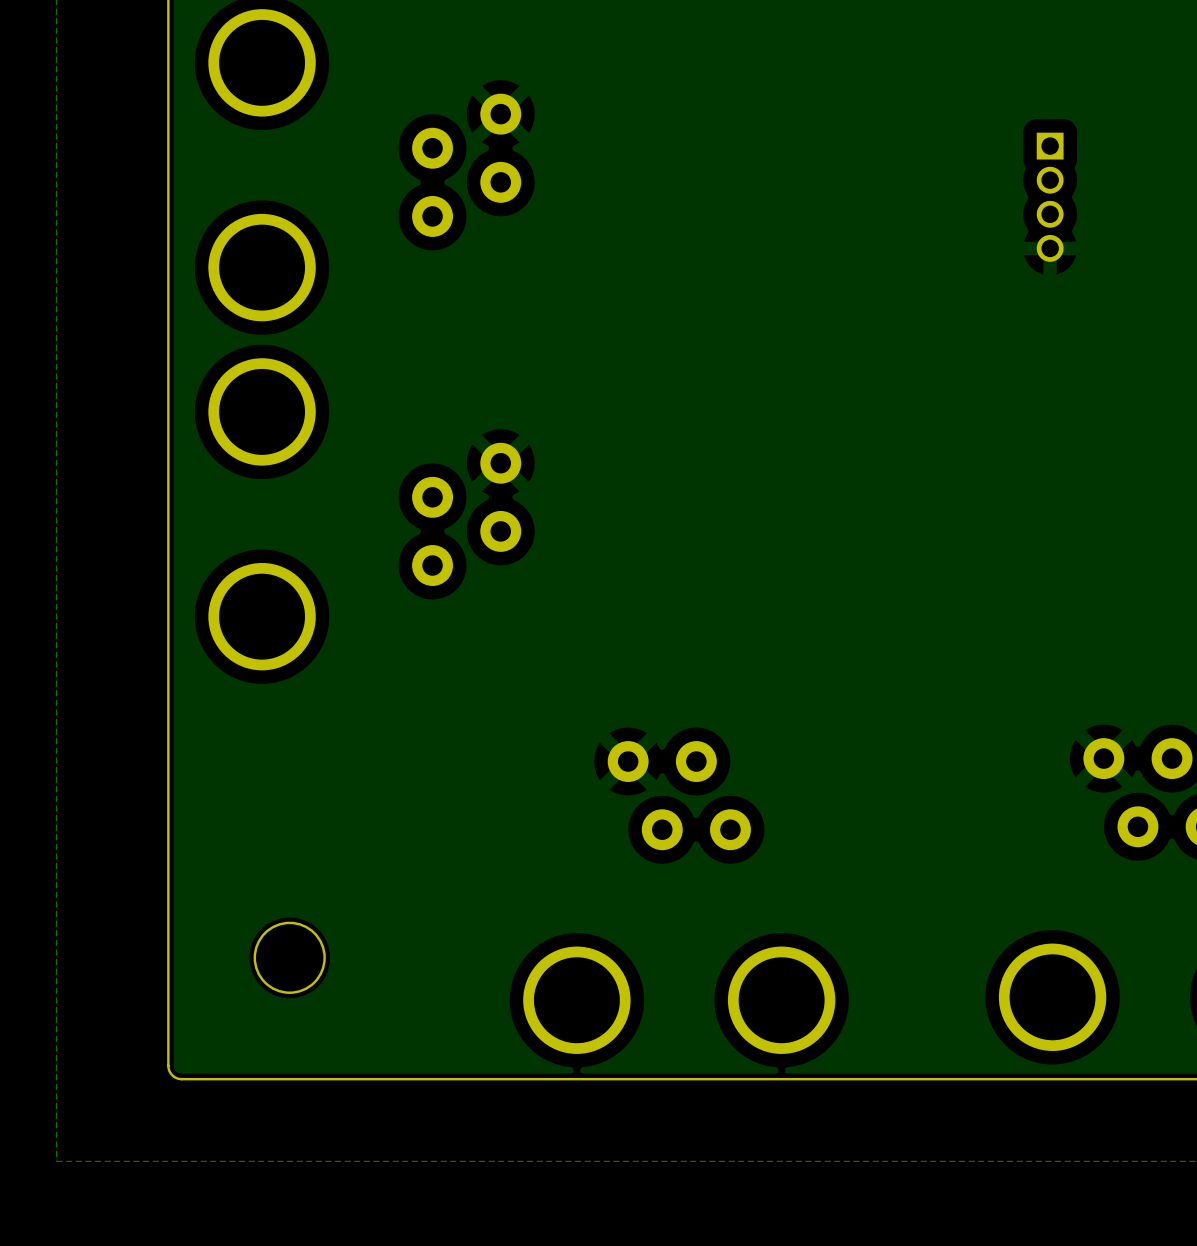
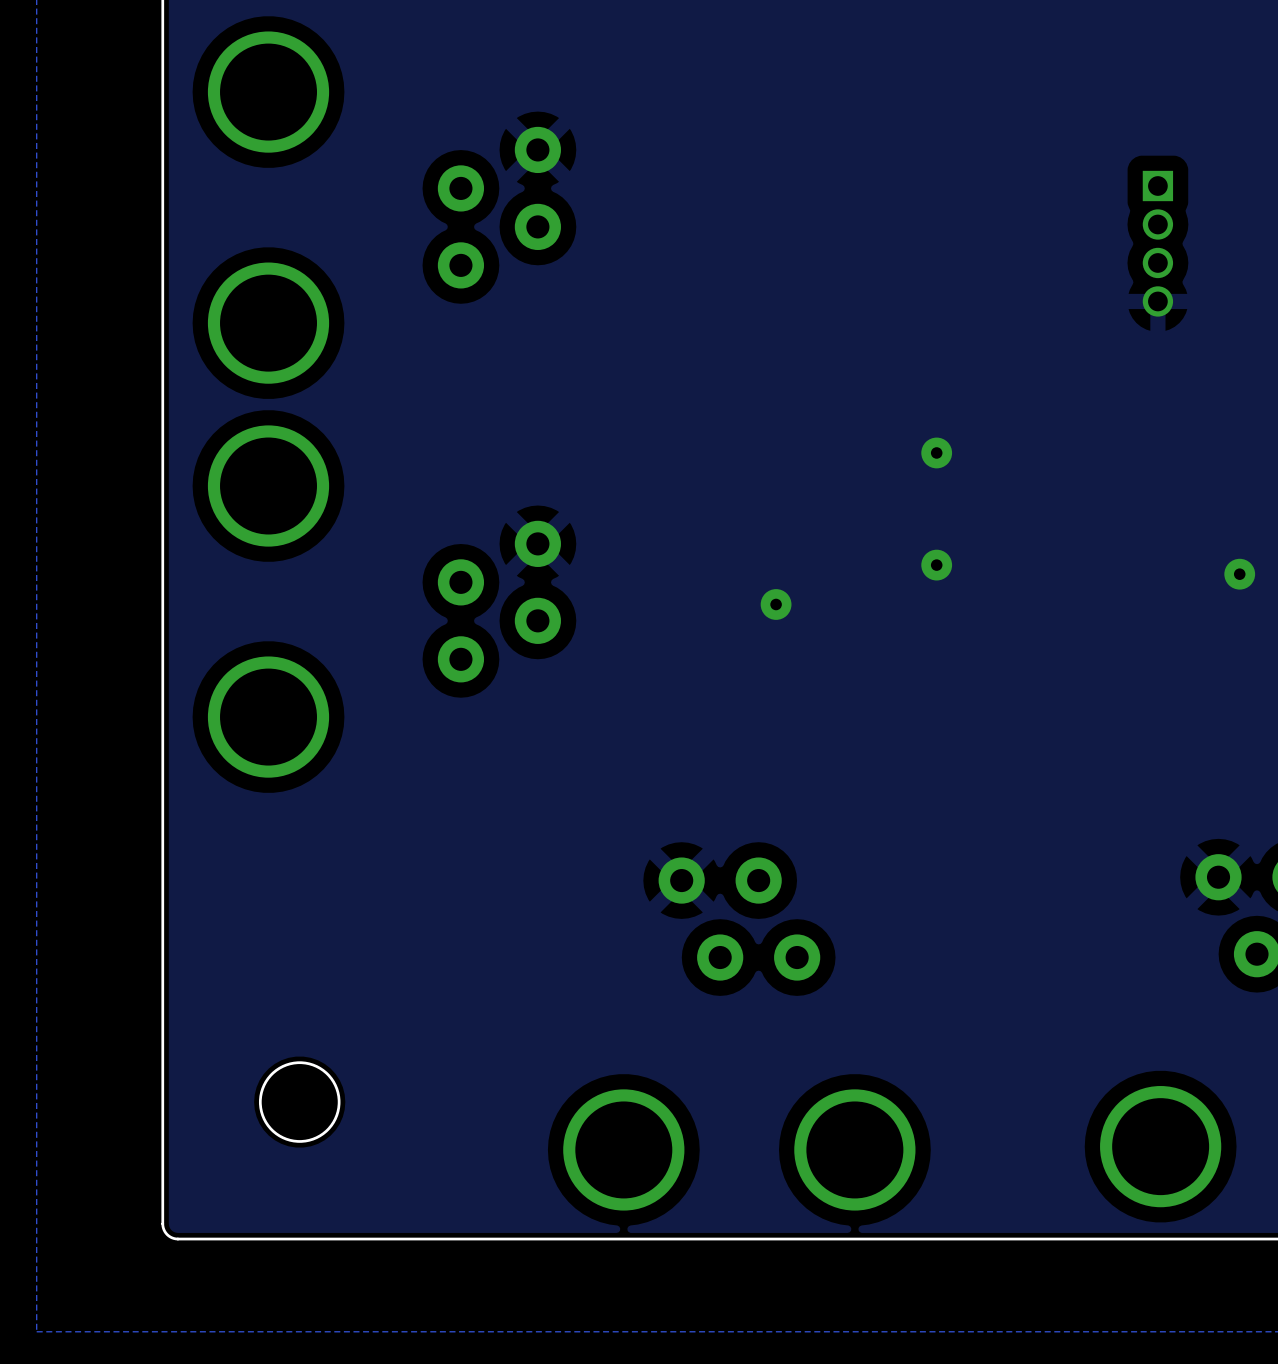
via: none -> (936, 452)
via: none -> (936, 565)
via: none -> (1239, 574)
via: none -> (776, 604)

